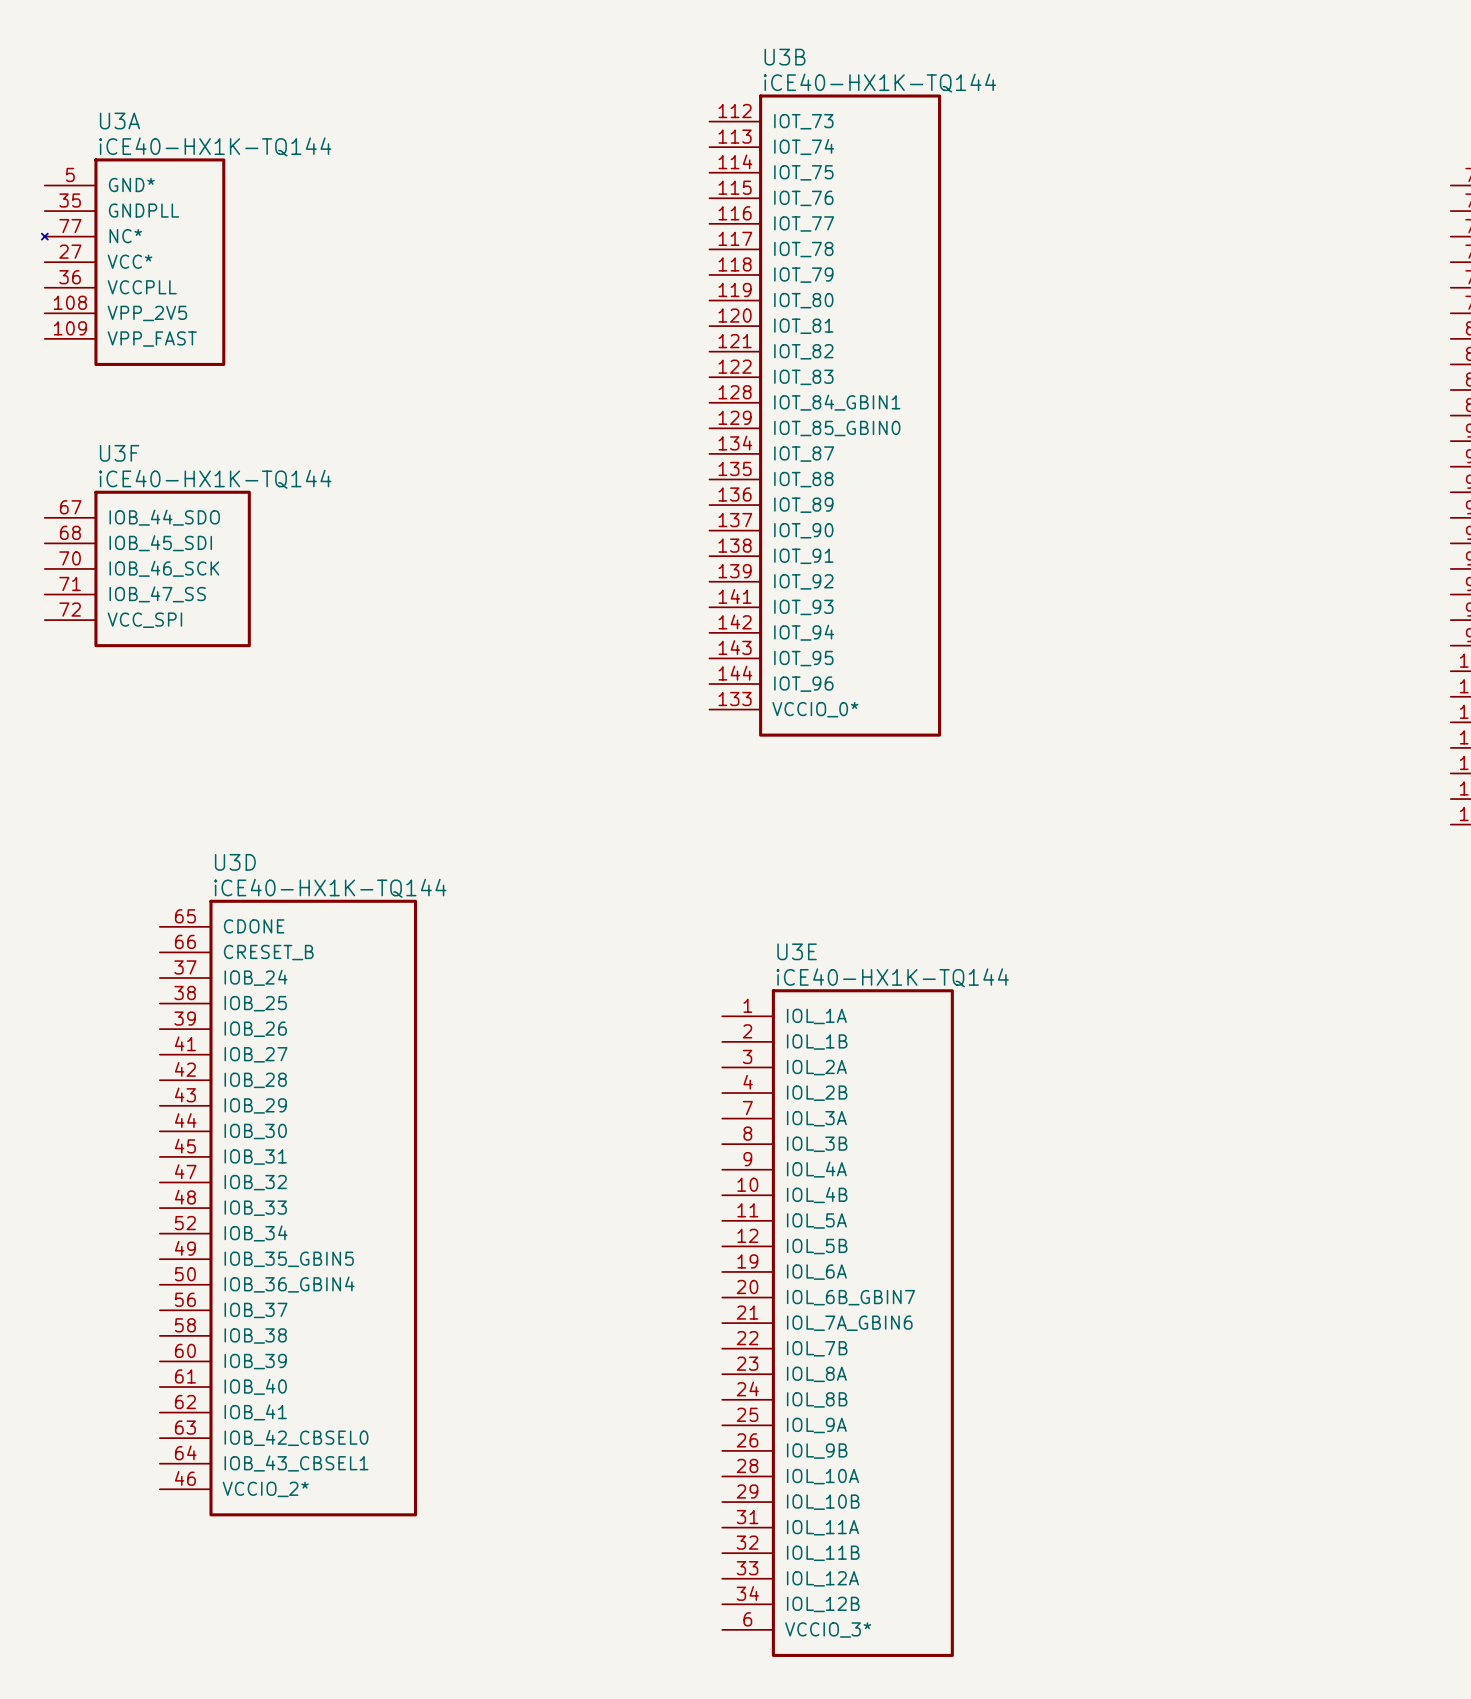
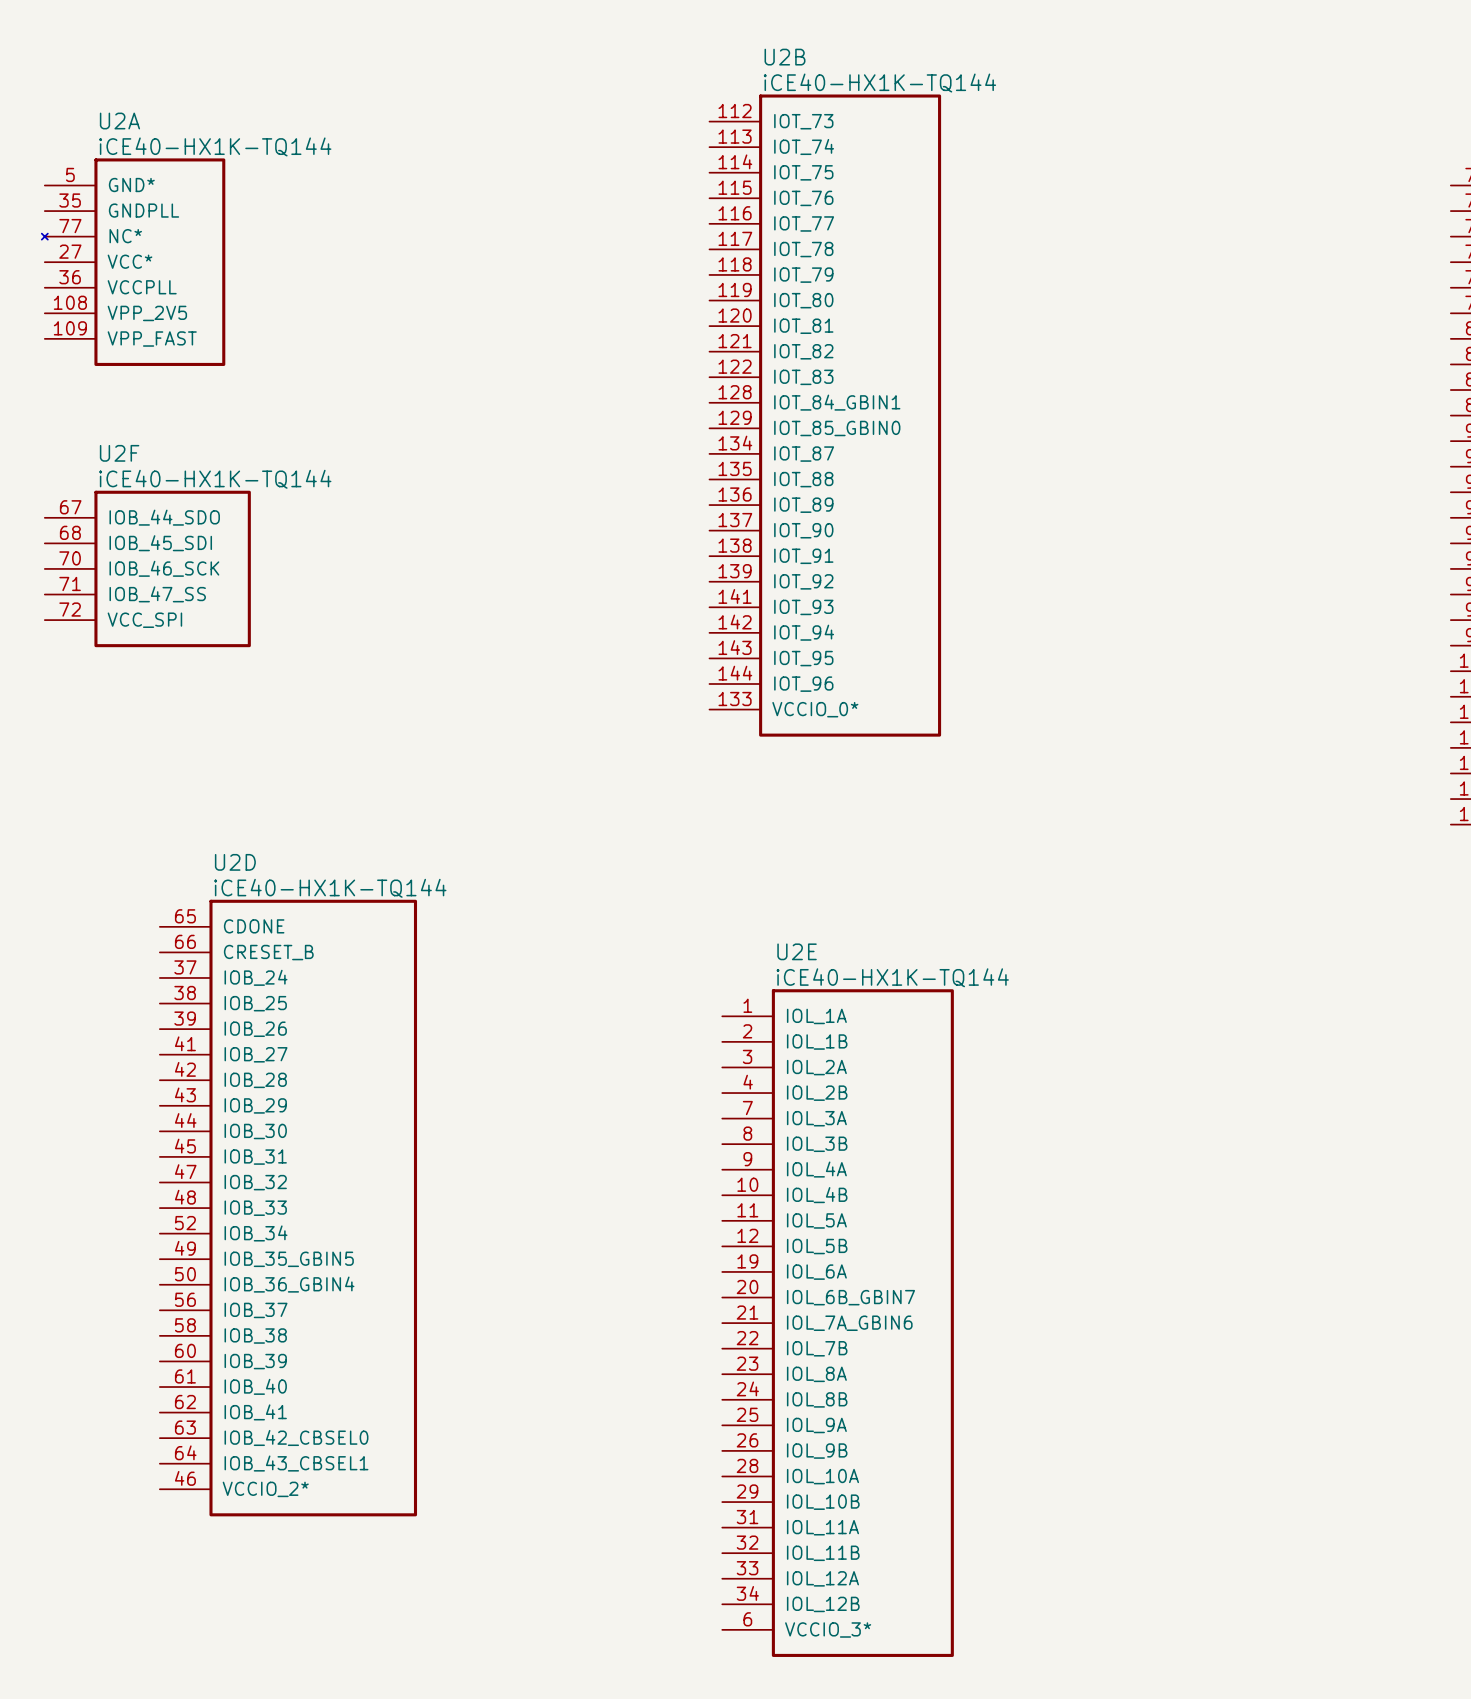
U3B name: U3B (784, 57) -> U2B (784, 57)
U3A name: U3A (119, 121) -> U2A (119, 121)
U3F name: U3F (119, 453) -> U2F (119, 453)
U3D name: U3D (235, 862) -> U2D (235, 862)
U3E name: U3E (797, 951) -> U2E (797, 951)

